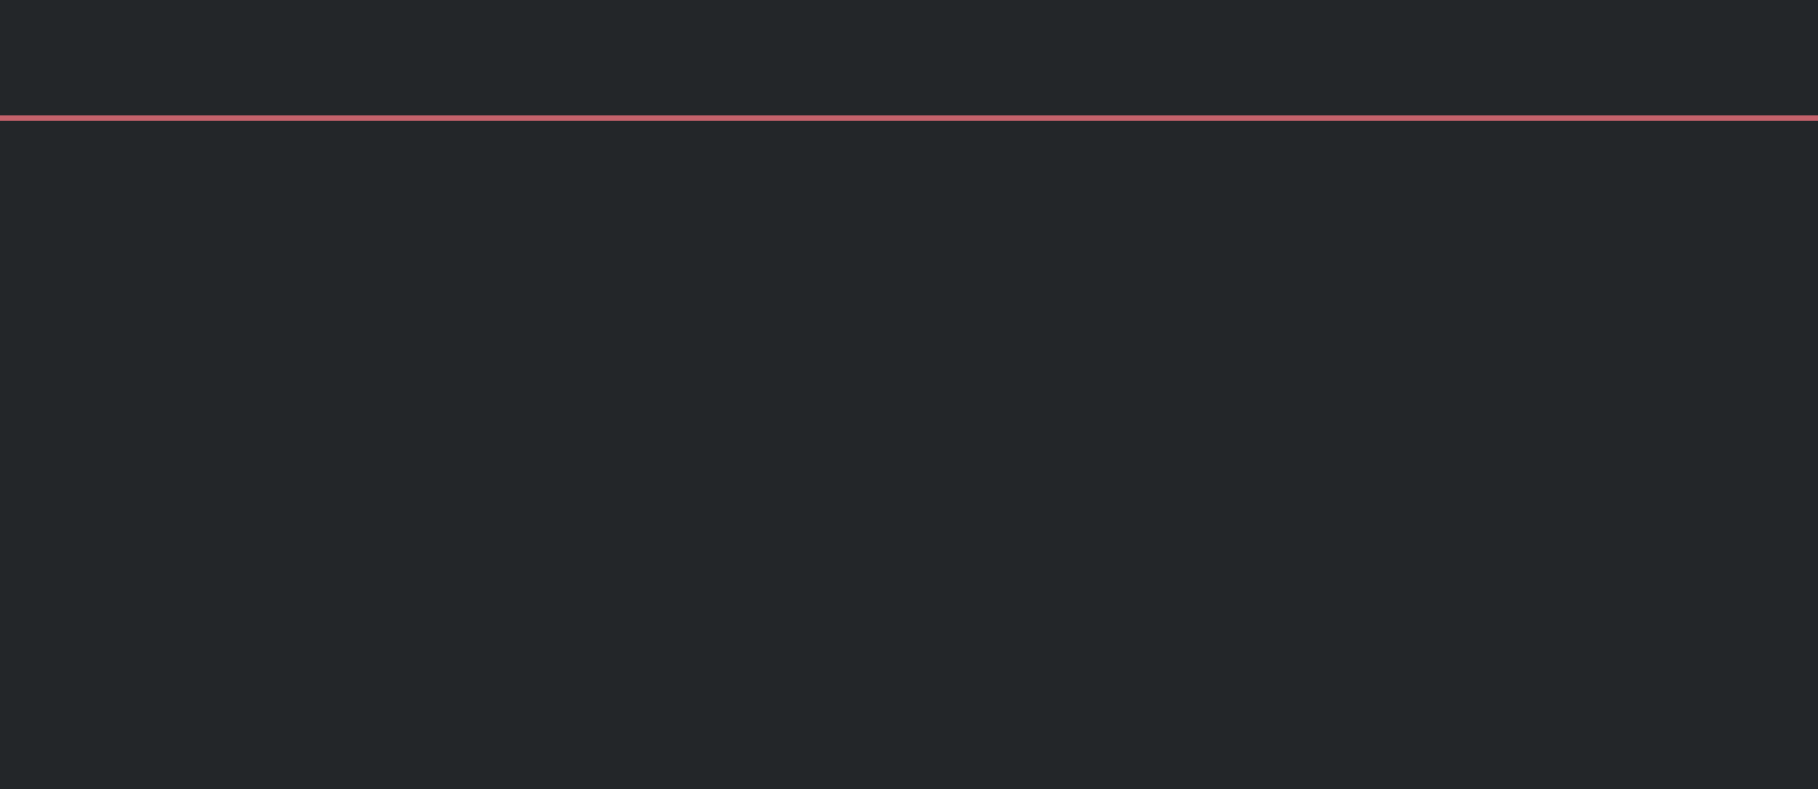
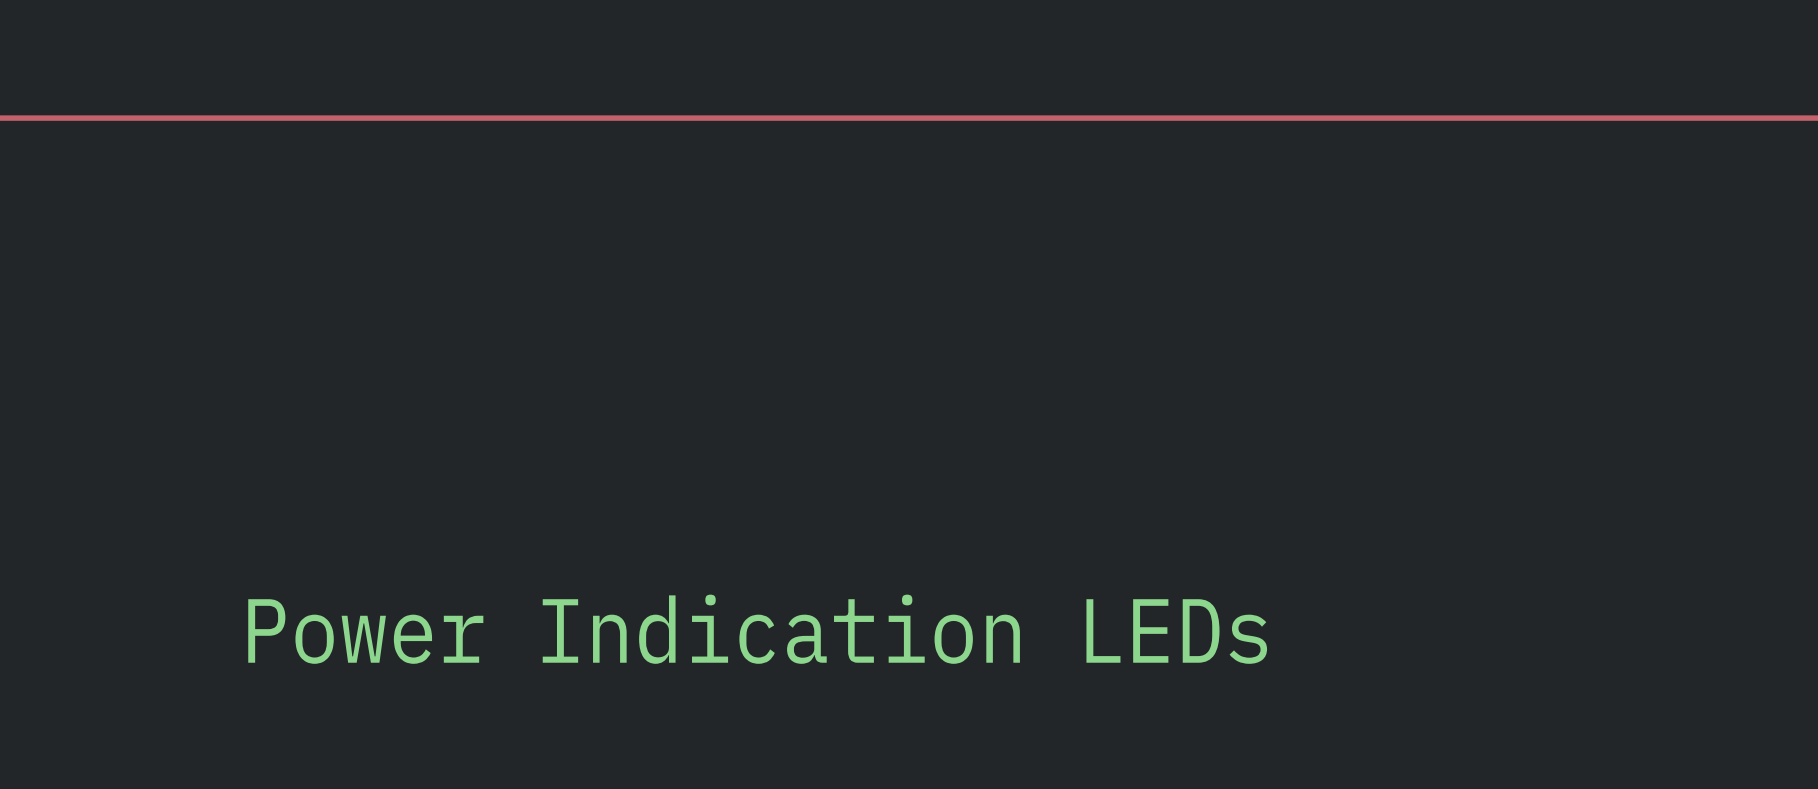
text: none -> Power Indication LEDs (757, 629)

